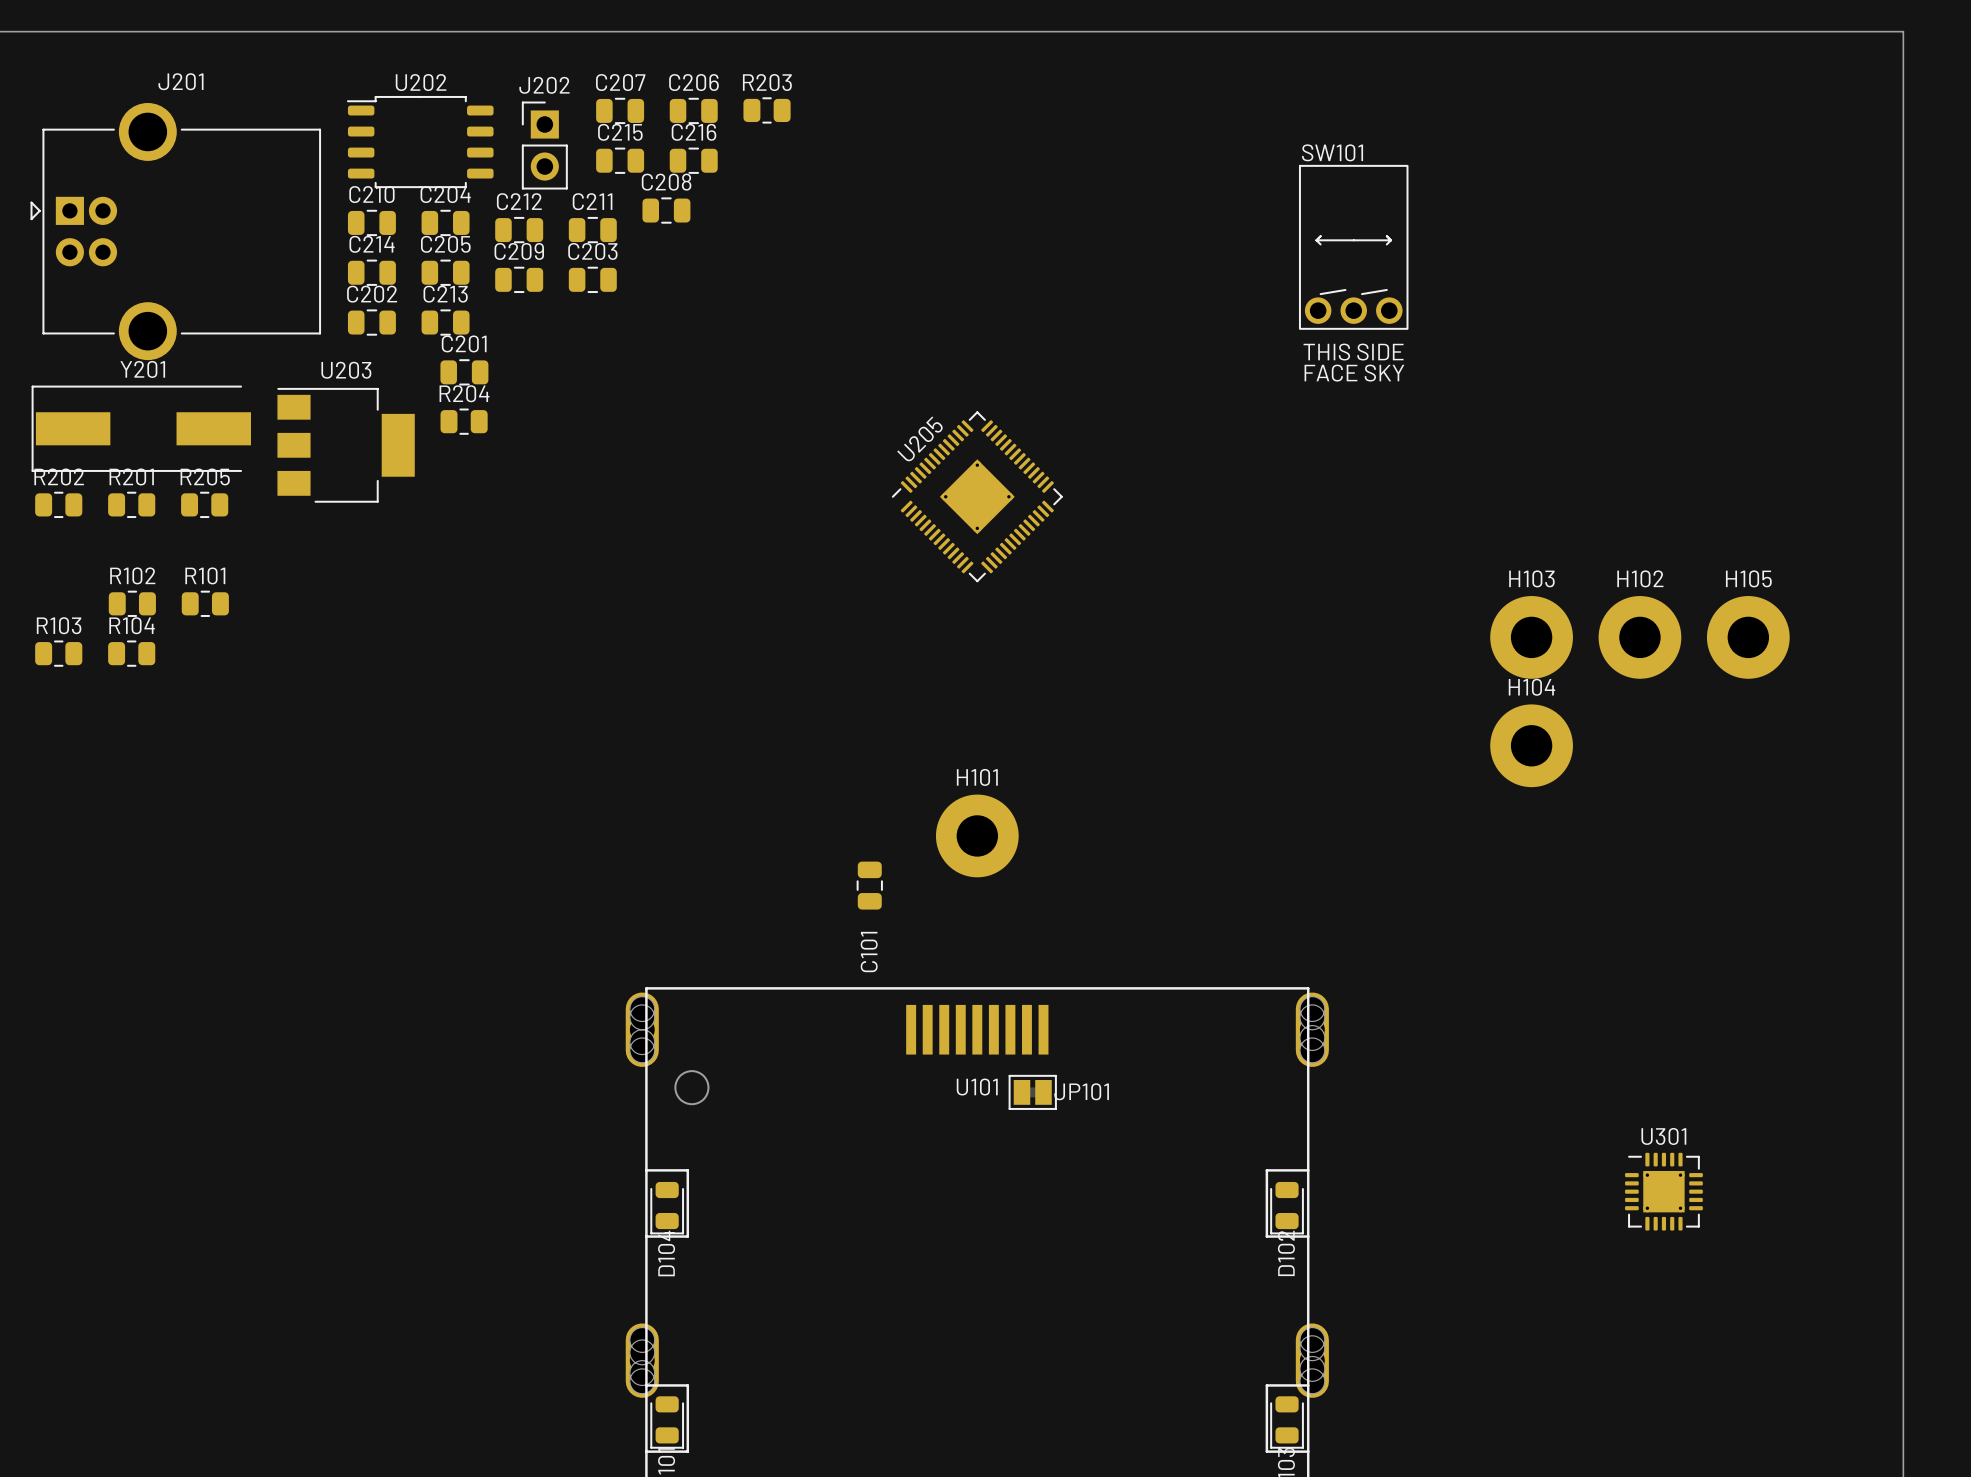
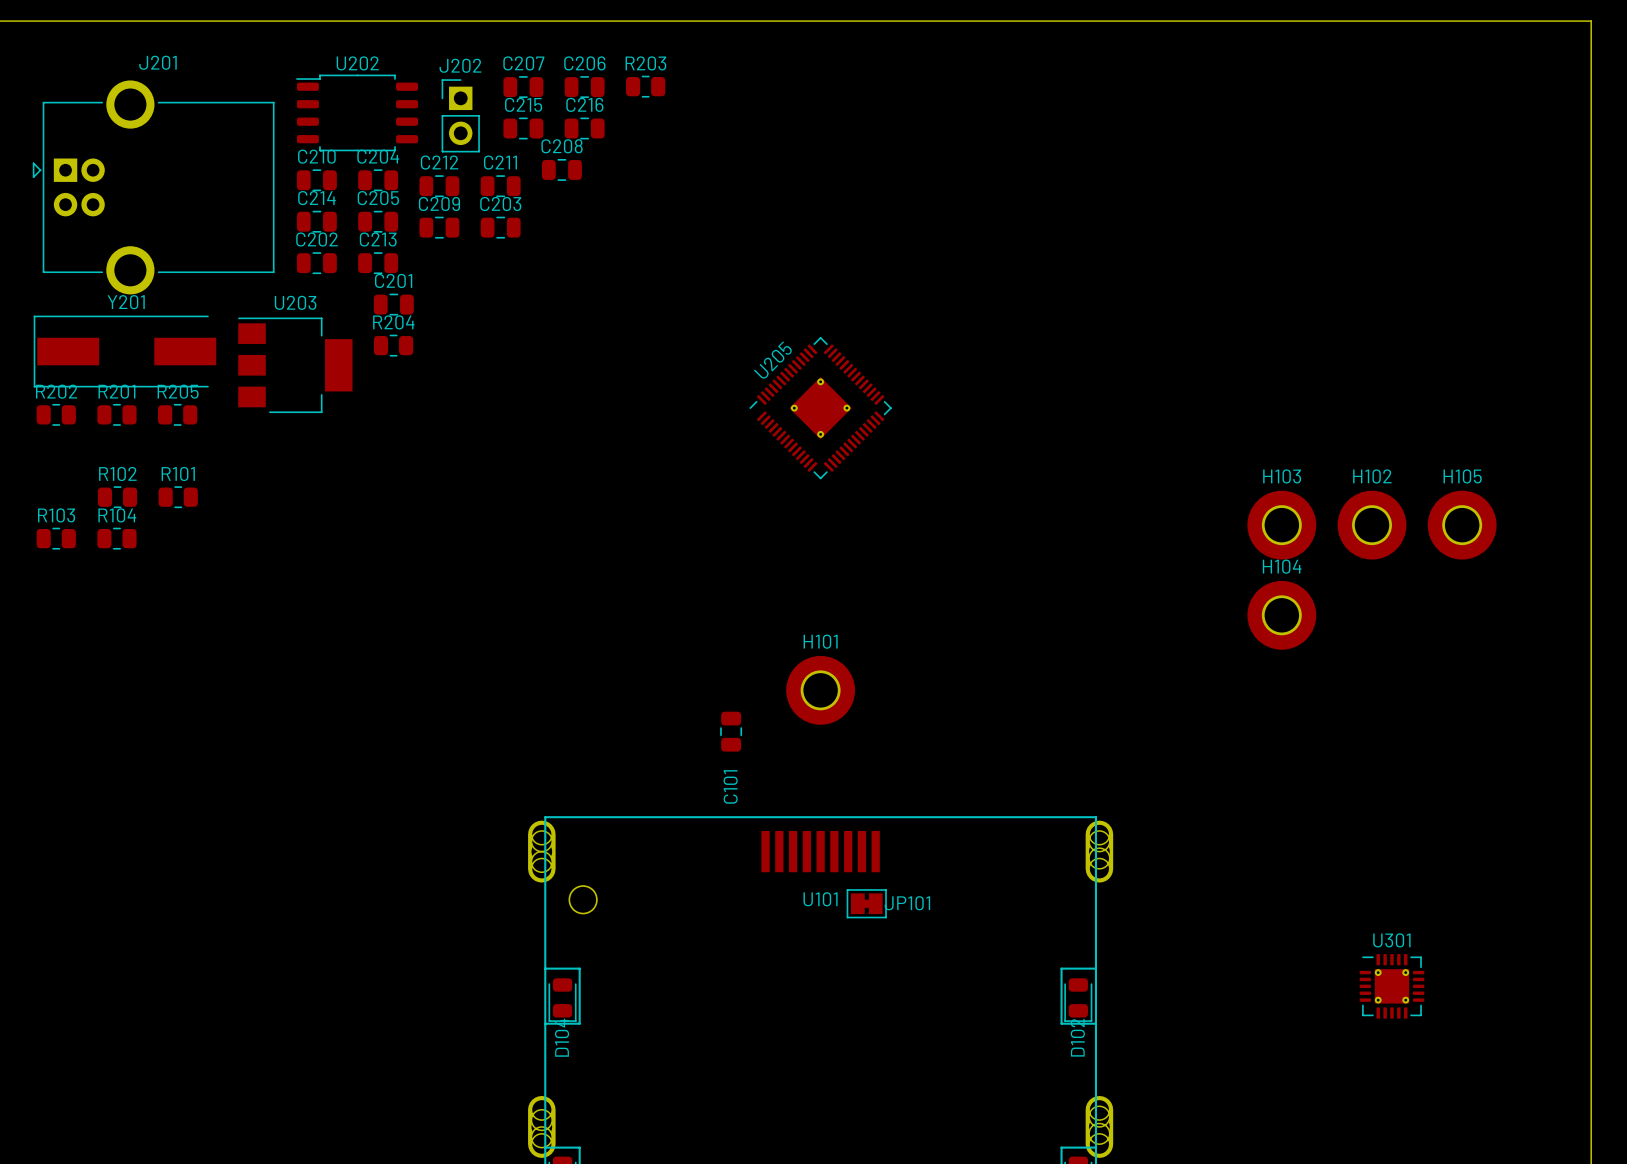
SW101: (1353, 247) -> none

